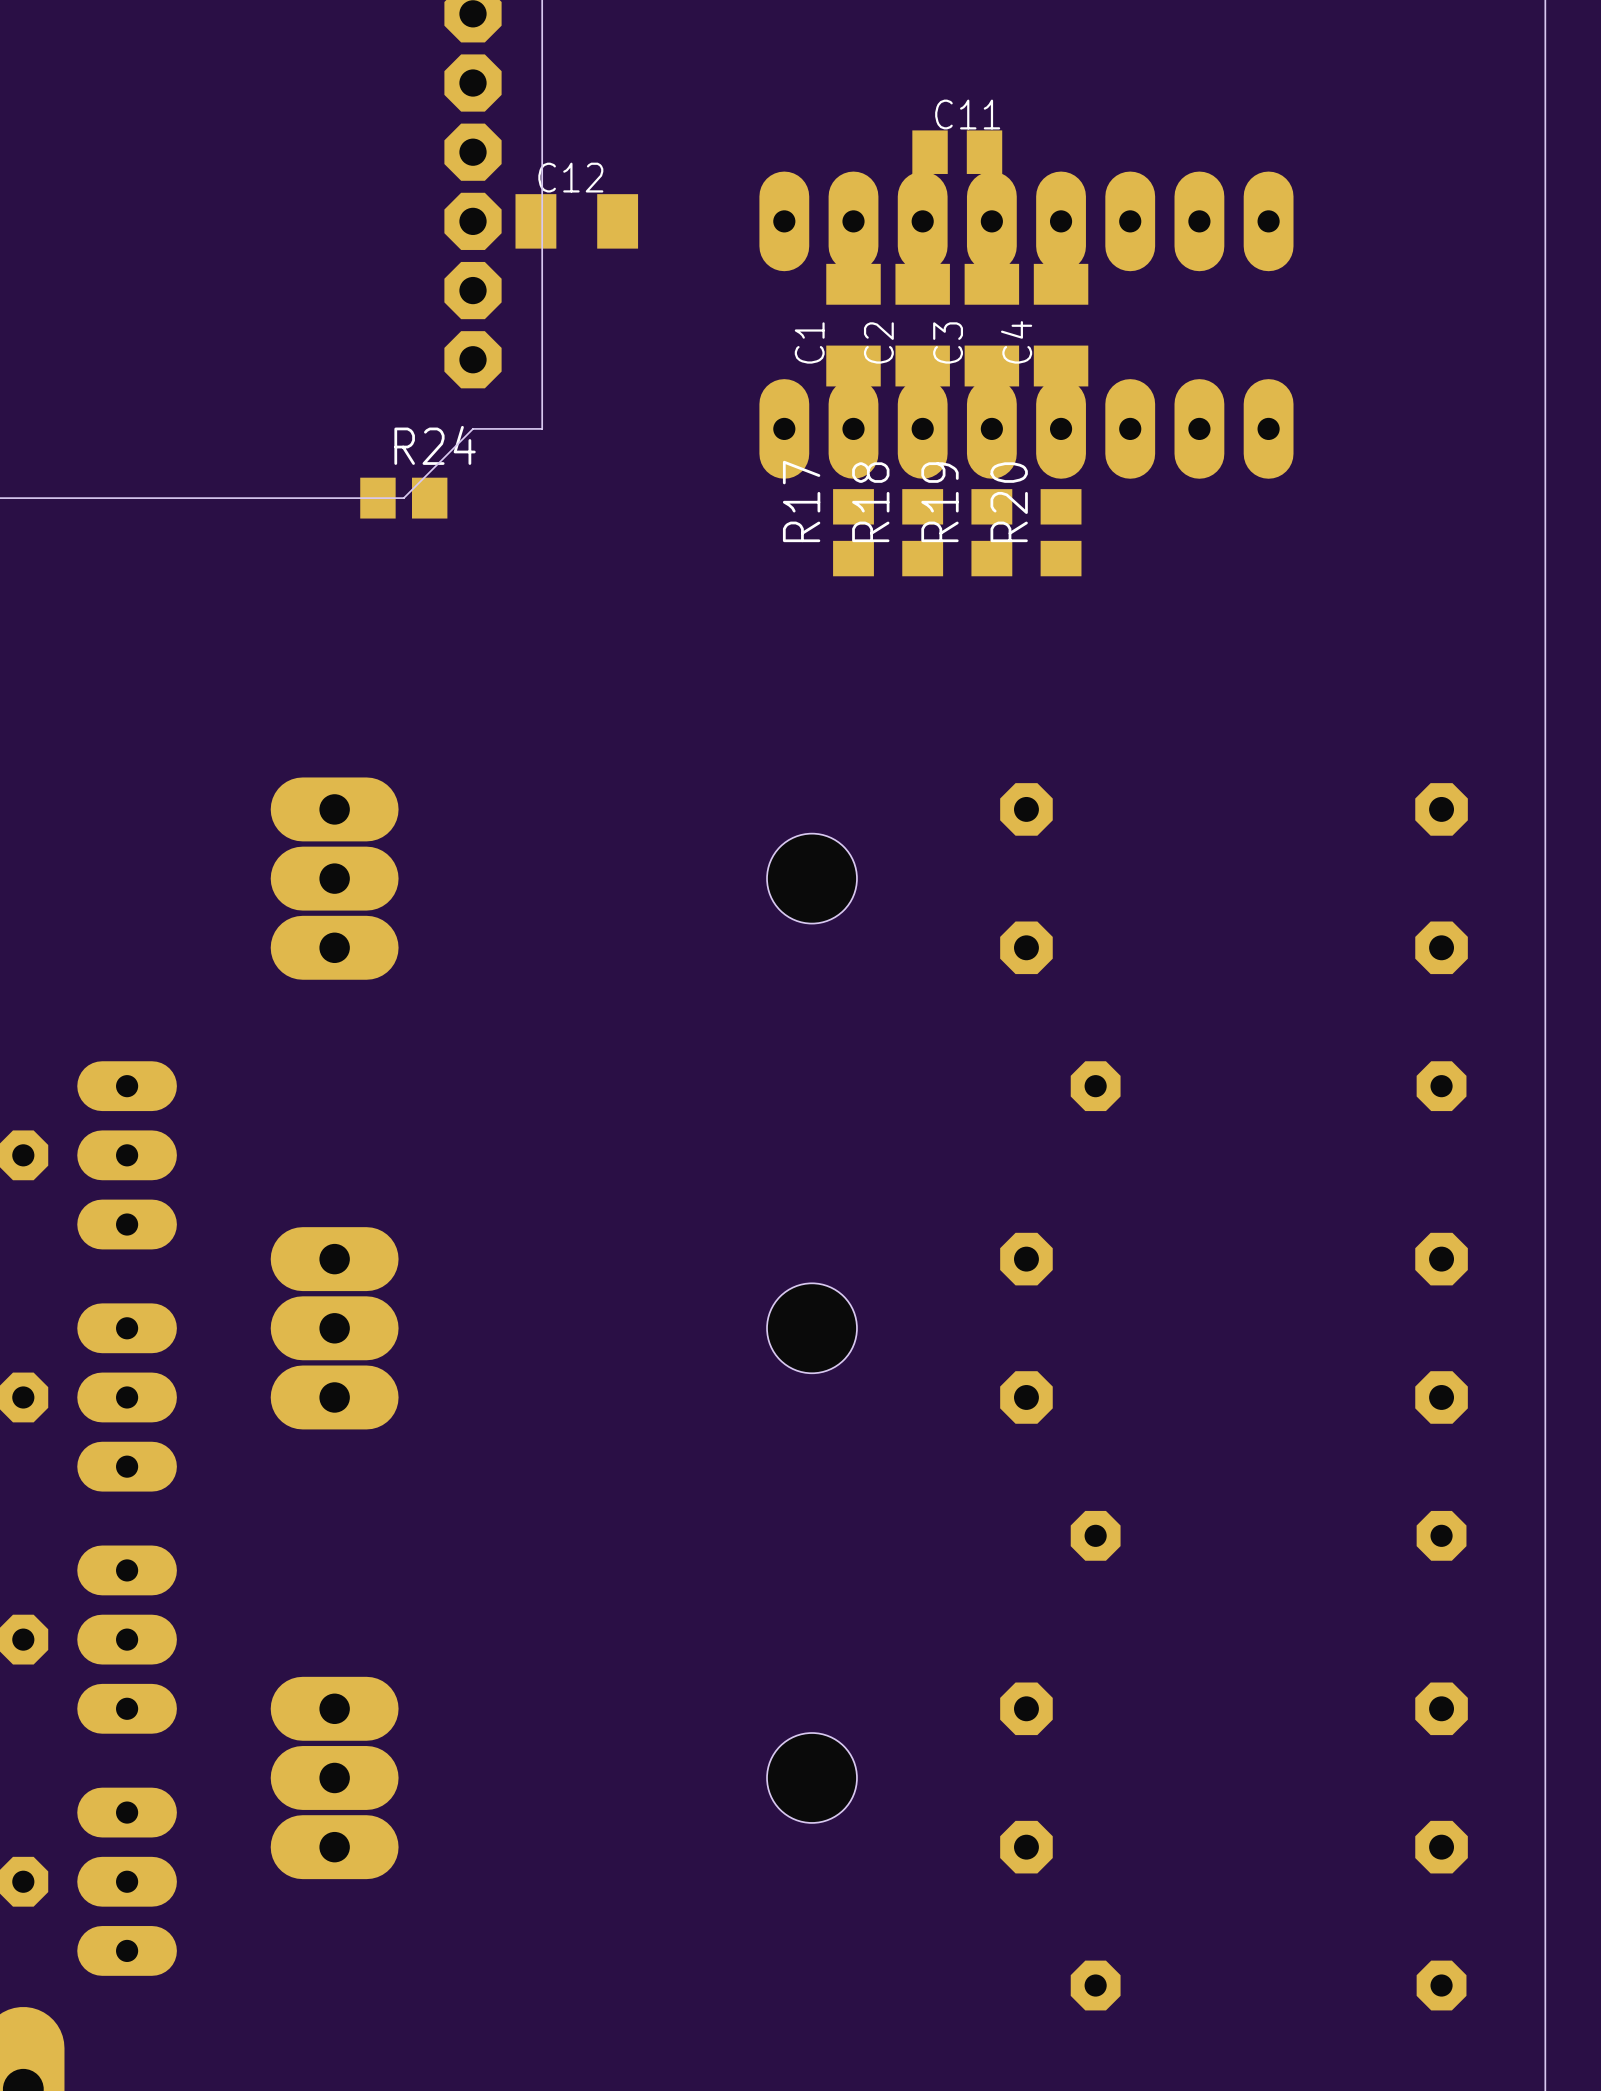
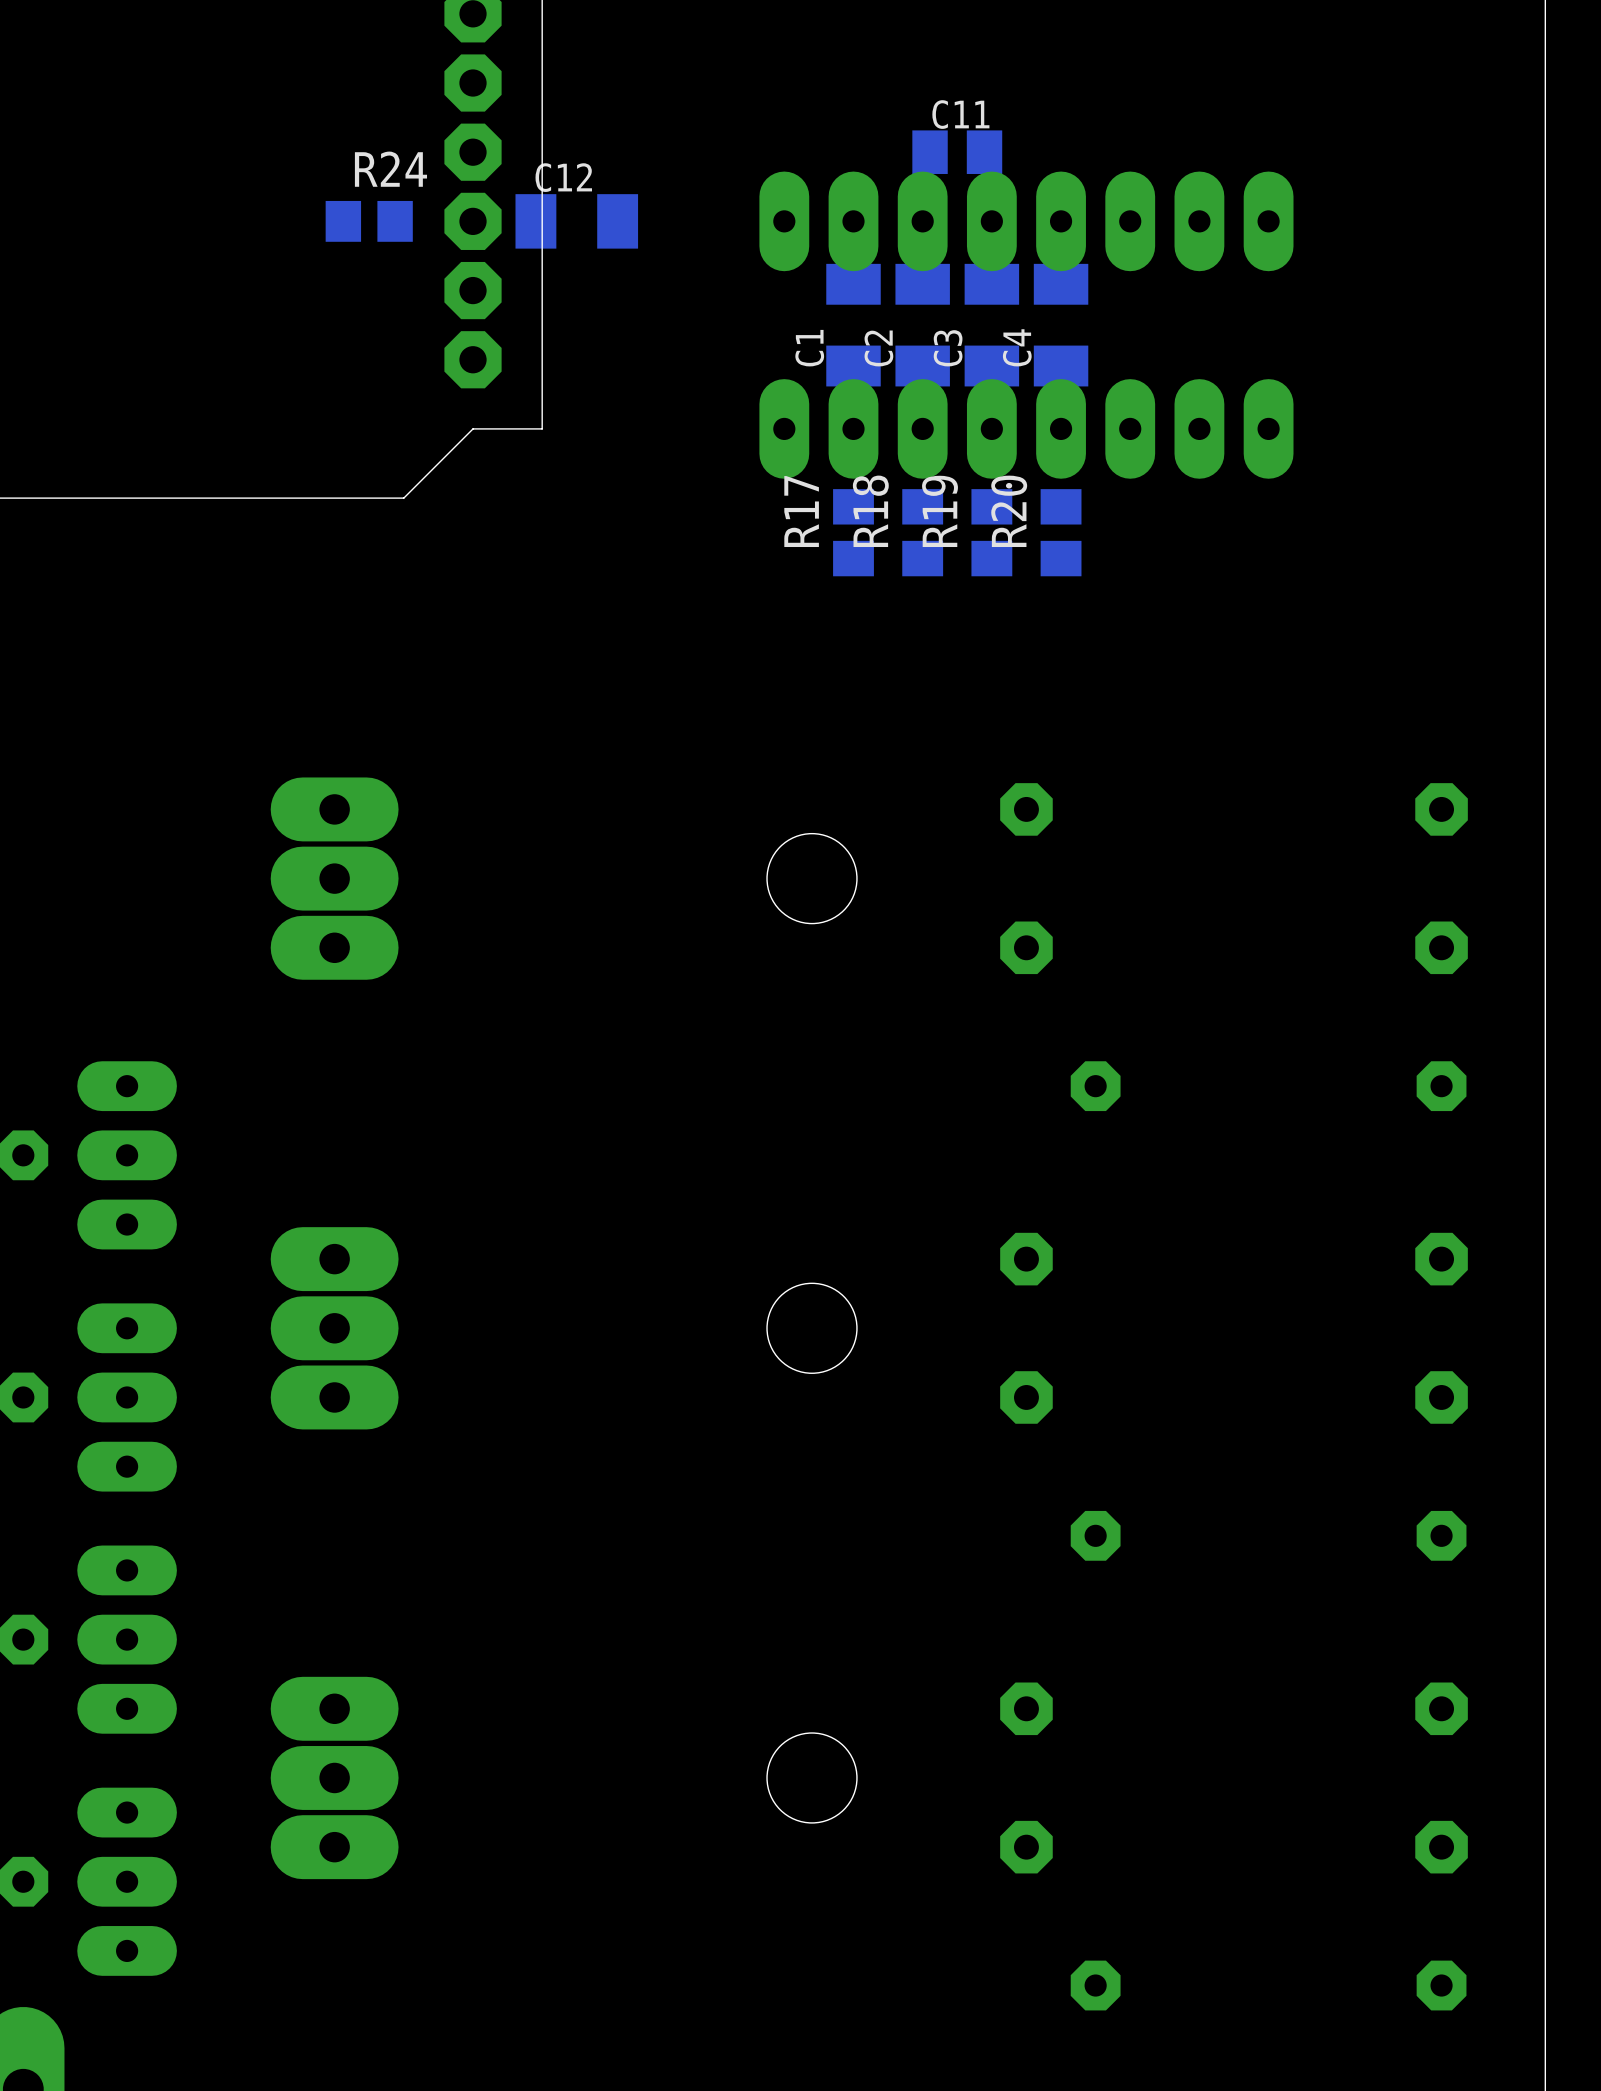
R24 position: (403, 498) -> (369, 221)

